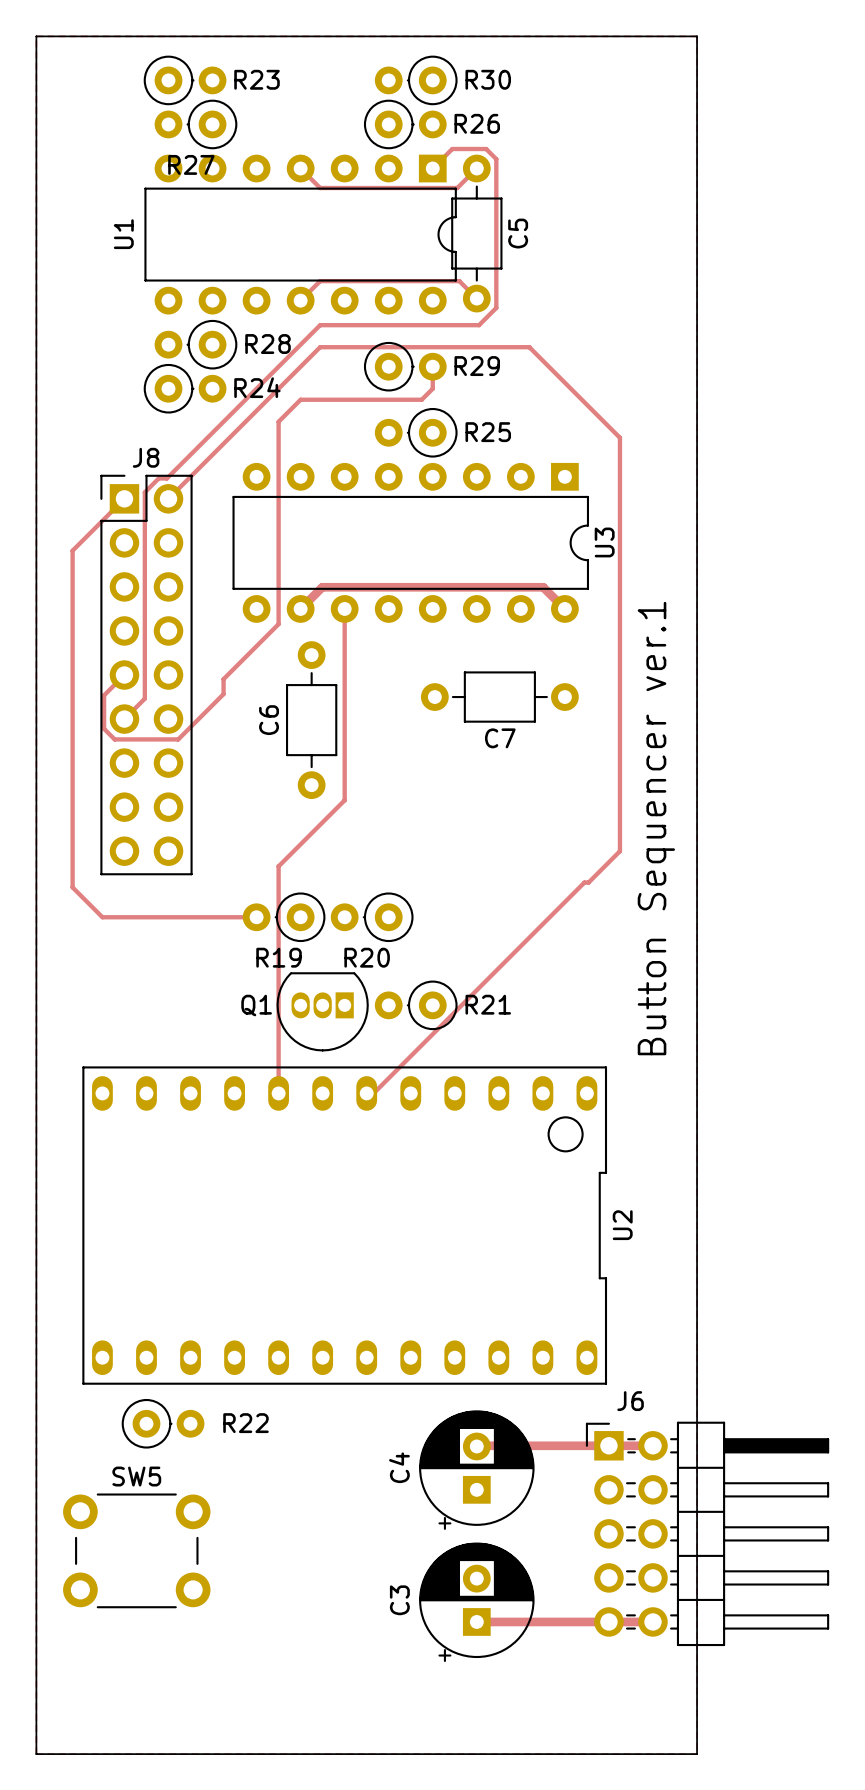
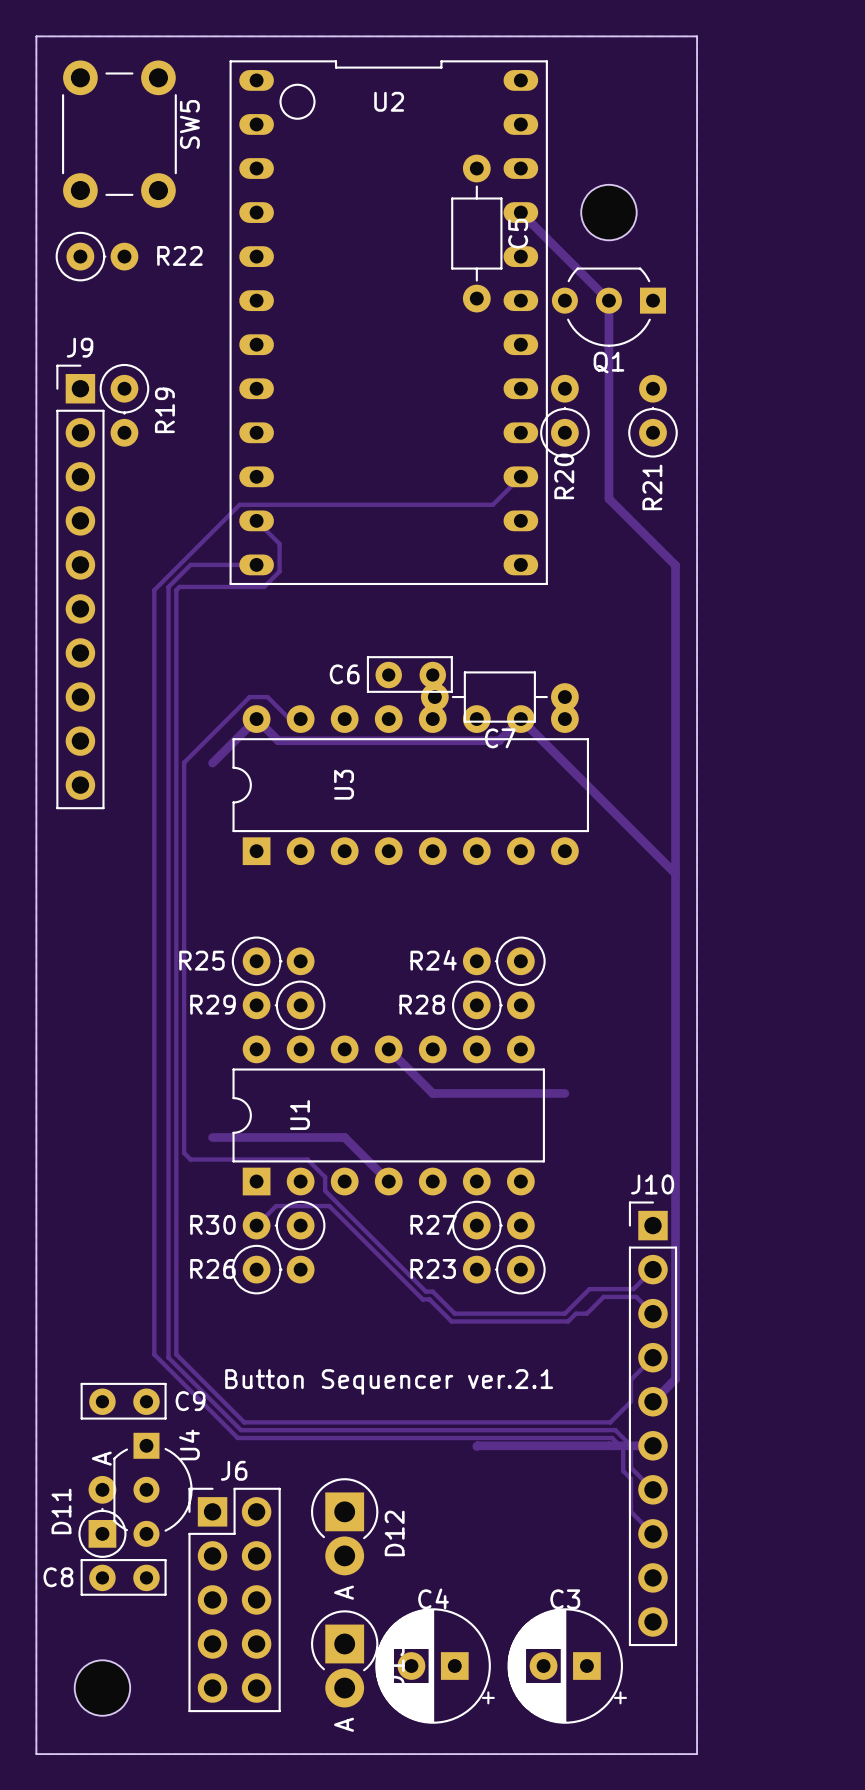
R30 name position: R30 (488, 79) -> R30 (212, 1224)
R23 rotation: 0° (185, 80) -> 180° (504, 1269)
R23 position: (185, 80) -> (504, 1269)
R26 rotation: 0° (416, 80) -> 180° (273, 1269)
R26 position: (416, 80) -> (273, 1269)
R26 name position: R26 (477, 123) -> R26 (212, 1268)
R27 rotation: 0° (195, 124) -> 180° (493, 1225)
R27 position: (195, 124) -> (493, 1225)
R30 rotation: 0° (405, 124) -> 180° (284, 1225)
R30 position: (405, 124) -> (284, 1225)
R27 name position: R27 (191, 164) -> R27 (433, 1224)
track: (300, 168) (320, 188) (457, 188) (476, 168) -> none
track: (432, 168) (452, 149) (486, 149) (496, 159) (496, 307) (479, 325) (320, 325) (166, 478) (158, 478) (144, 492) (144, 698) (124, 719) -> none
track: none -> (520, 212) (608, 300) (608, 498) (675, 565) (675, 1379) (652, 1401)
part: none -> (608, 212)
U1 name position: U1 (123, 234) -> U1 (299, 1115)
U1 rotation: 0° (300, 234) -> 180° (388, 1115)
U1 position: (300, 234) -> (388, 1115)
track: (476, 298) (459, 281) (320, 281) (300, 300) -> none
R28 rotation: 0° (195, 344) -> 180° (493, 1005)
R28 position: (195, 344) -> (493, 1005)
R29 rotation: 0° (405, 366) -> 180° (284, 1005)
R29 position: (405, 366) -> (284, 1005)
track: (432, 366) (432, 388) (421, 399) (300, 399) (278, 421) (278, 624) (223, 679) (223, 694) (178, 739) (114, 739) (104, 728) (104, 695) (124, 675) -> none
R24 rotation: 0° (185, 388) -> 180° (504, 961)
R24 position: (185, 388) -> (504, 961)
R25 rotation: 0° (416, 432) -> 180° (273, 961)
R25 position: (416, 432) -> (273, 961)
track: none -> (520, 476) (492, 504) (239, 504) (154, 590) (154, 1354) (237, 1437) (612, 1437) (623, 1449) (623, 1471) (630, 1478) (630, 1511) (652, 1533)
track: (124, 498) (72, 550) (72, 887) (102, 917) (256, 917) -> none
track: (168, 498) (320, 347) (529, 347) (619, 437) (619, 851) (588, 882) (584, 882) (373, 1093) (366, 1093) -> none
track: none -> (256, 520) (279, 543) (279, 571) (264, 586) (179, 586) (176, 590) (176, 1354) (244, 1422) (610, 1422) (630, 1401) (630, 1379) (652, 1357) (650, 1357)
U3 rotation: 0° (410, 542) -> 180° (410, 785)
U3 position: (410, 542) -> (410, 785)
U3 name position: U3 (604, 542) -> U3 (344, 784)
track: none -> (256, 564) (190, 564) (168, 586) (168, 1357) (241, 1430) (615, 1430) (630, 1445) (630, 1467) (652, 1489)
J9: none -> (80, 586)
track: (300, 608) (322, 587) (543, 587) (564, 608) -> none
track: (344, 608) (344, 800) (278, 866) (278, 1093) -> none
C6 footprint: [285, 641, 338, 800] -> [366, 656, 453, 693]
J8: (146, 675) -> none
track: none -> (300, 719) (289, 719) (267, 697) (249, 697) (184, 762) (184, 1153) (190, 1159) (307, 1159) (325, 1177) (325, 1190) (425, 1291) (432, 1291) (454, 1313) (564, 1313) (589, 1289) (633, 1289) (652, 1269)
track: none -> (212, 763) (256, 719) (278, 740) (499, 740) (520, 719) (675, 873)
text: Button Sequencer ver.1 (656, 828) -> none
R19 rotation: 0° (284, 917) -> 90° counterclockwise (124, 405)
R19 position: (284, 917) -> (124, 405)
R20 rotation: 0° (372, 917) -> 90° clockwise (564, 416)
R20 position: (372, 917) -> (564, 416)
Q1 footprint: [276, 972, 369, 1052] -> [551, 267, 667, 347]
Q1 name position: Q1 (256, 1005) -> Q1 (608, 362)
R21 rotation: 0° (416, 1005) -> 90° clockwise (652, 416)
R21 position: (416, 1005) -> (652, 416)
track: none -> (388, 1049) (432, 1093) (564, 1093)
track: none -> (212, 1137) (344, 1137) (388, 1181)
track: none -> (256, 1225) (276, 1206) (329, 1206) (422, 1299) (429, 1299) (451, 1321) (568, 1321) (575, 1313) (586, 1313) (603, 1296) (636, 1296) (652, 1313)
U2 rotation: 0° (344, 1225) -> 90° counterclockwise (388, 322)
U2 position: (344, 1225) -> (388, 322)
U2 name position: U2 (622, 1225) -> U2 (389, 101)
text: none -> Button Sequencer ver.2.1 (389, 1381)
C9: none -> (123, 1401)
J6 name position: J6 (630, 1401) -> J6 (234, 1470)
J6 footprint: [585, 1421, 830, 1647] -> [188, 1487, 281, 1713]
R22 position: (163, 1423) -> (96, 256)
J10: none -> (652, 1423)
C4 name position: C4 (399, 1467) -> C4 (433, 1598)
C4 rotation: 0° (476, 1470) -> 90° counterclockwise (435, 1666)
C4 position: (476, 1470) -> (435, 1666)
U4: none -> (152, 1489)
D11: none -> (102, 1516)
D12: none -> (344, 1526)
SW5 rotation: 0° (136, 1550) -> 90° clockwise (119, 134)
SW5 position: (136, 1550) -> (119, 134)
C8: none -> (123, 1577)
C3 name position: C3 (399, 1600) -> C3 (565, 1599)
C3 rotation: 0° (476, 1602) -> 90° counterclockwise (567, 1666)
C3 position: (476, 1602) -> (567, 1666)
track: (476, 1621) (652, 1621) -> none
part: none -> (344, 1658)
part: none -> (102, 1688)

